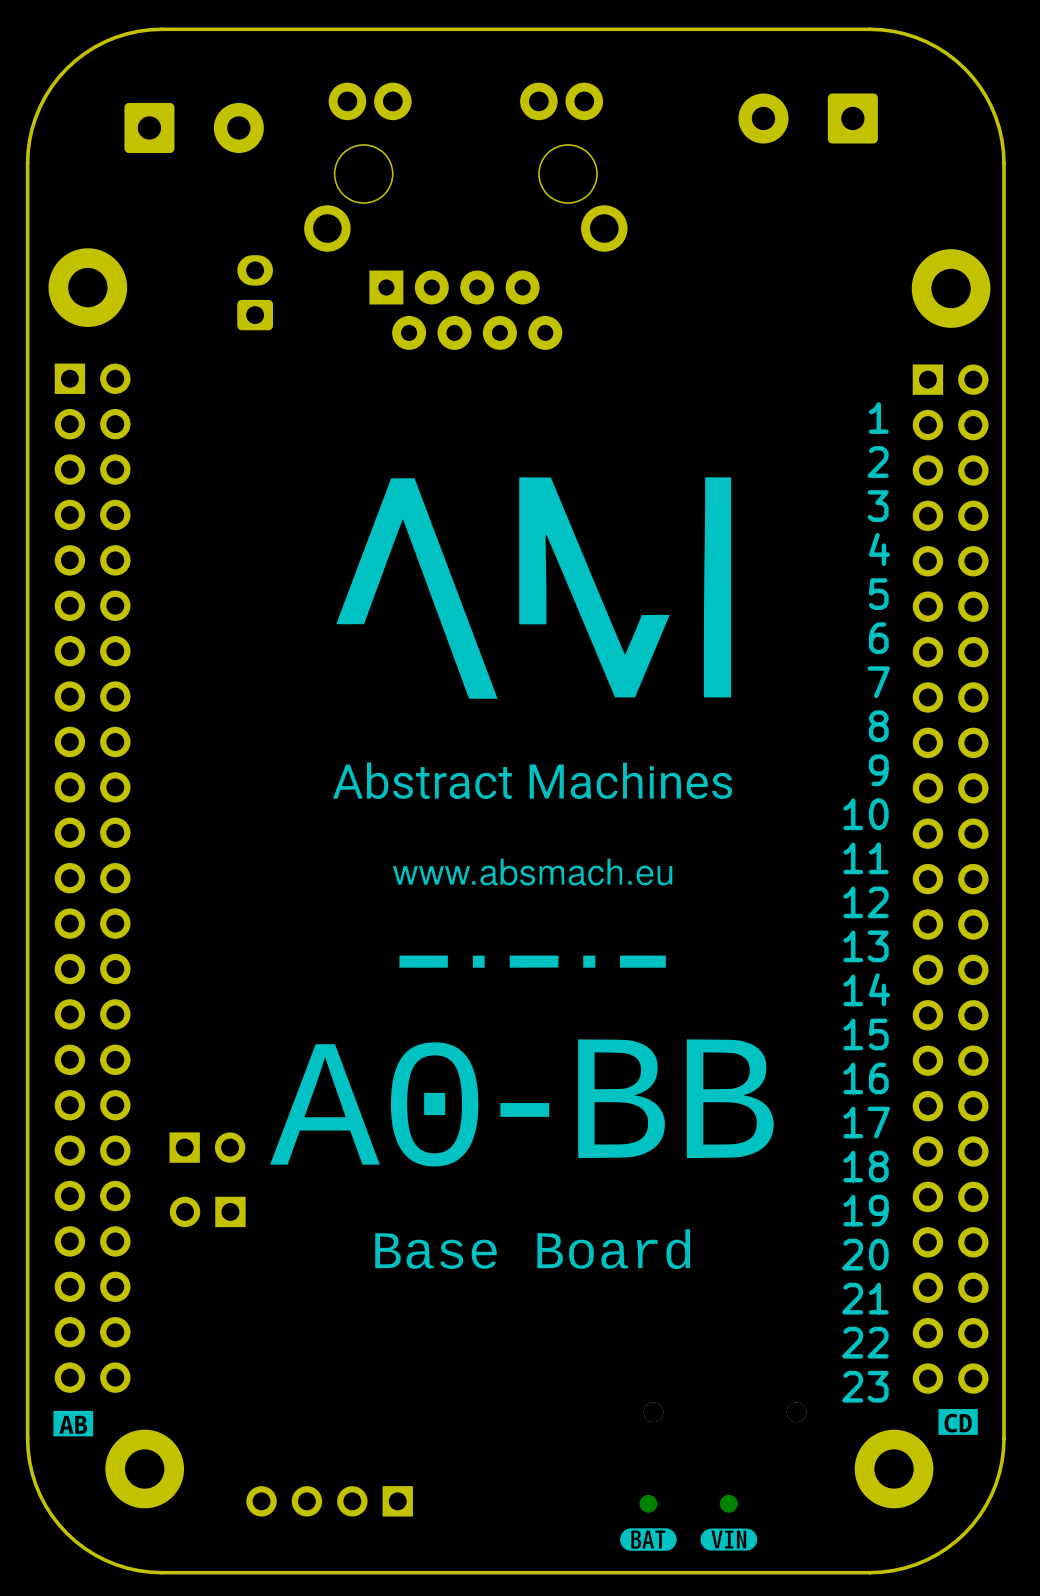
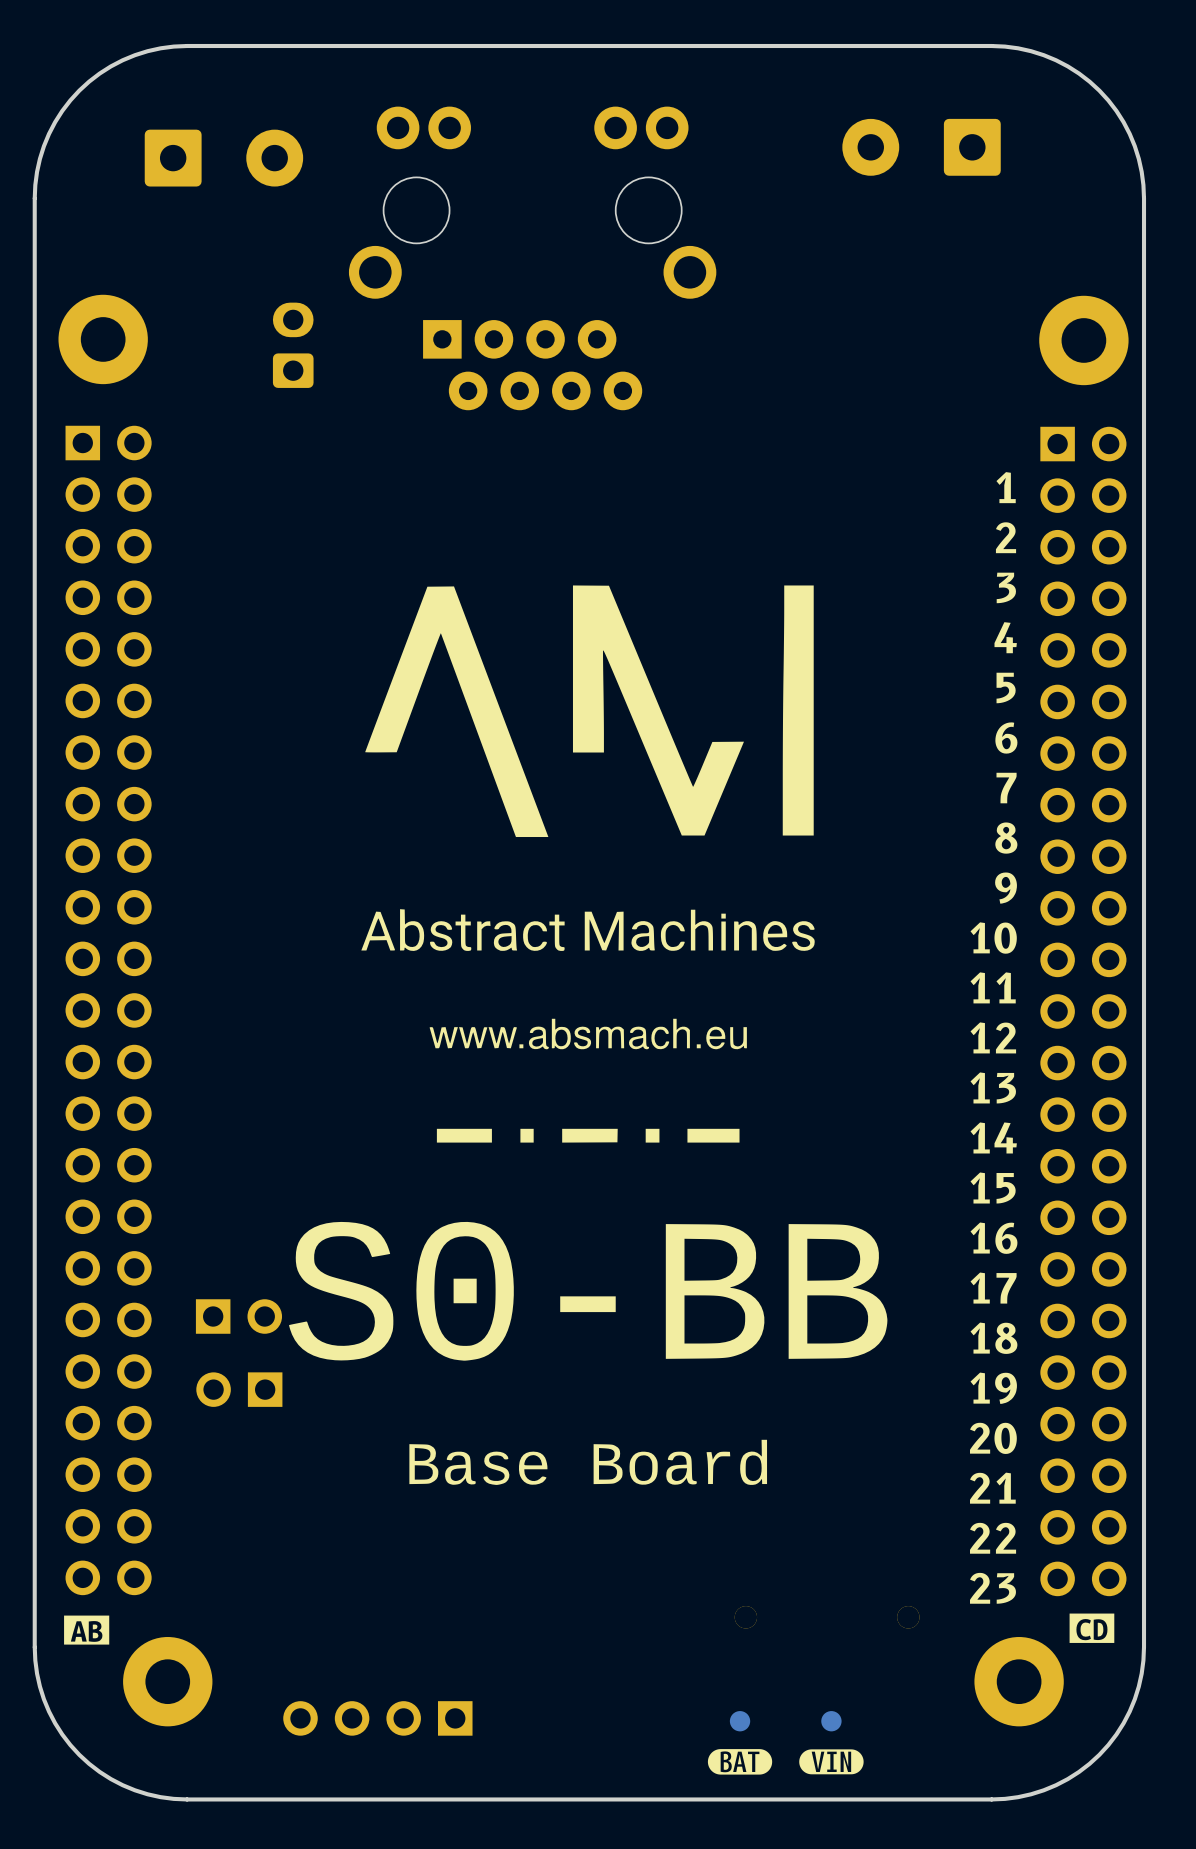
drawing: [270, 477, 774, 1270] -> none
drawing: none -> [289, 585, 888, 1485]

